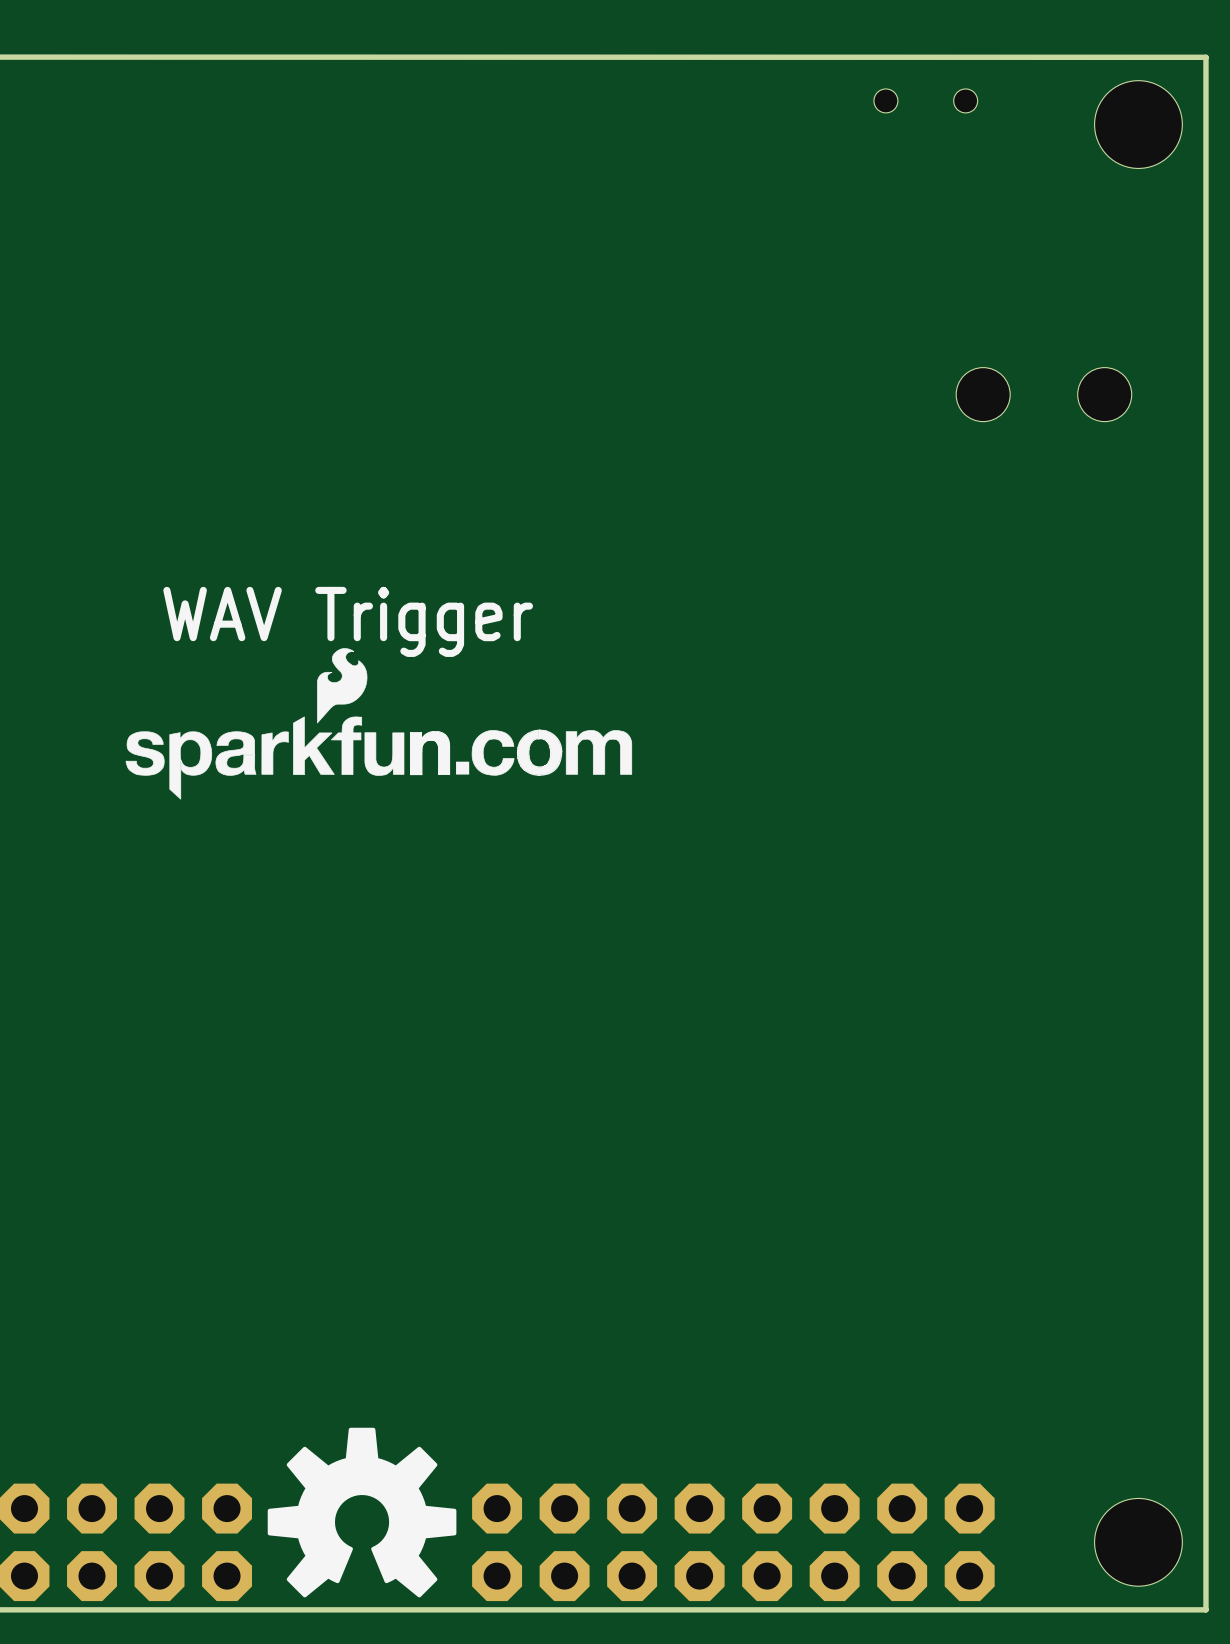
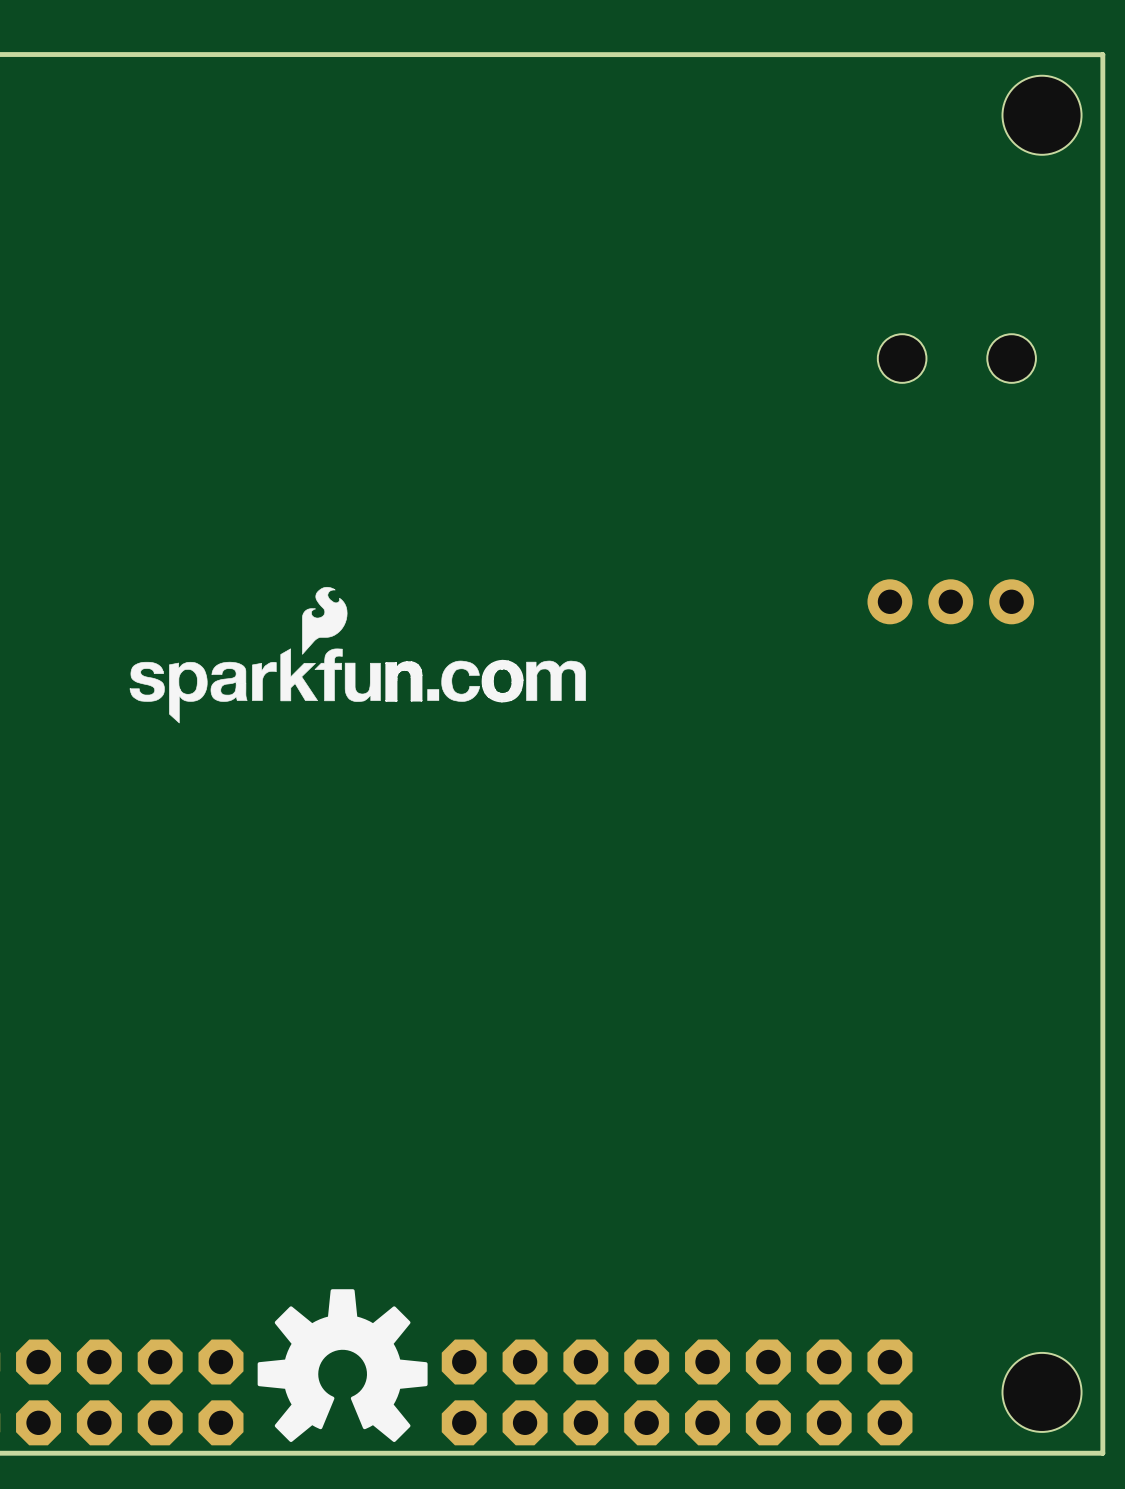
part: (925, 100) -> none
text: WAV Trigger (348, 621) -> none
part: none -> (950, 601)

